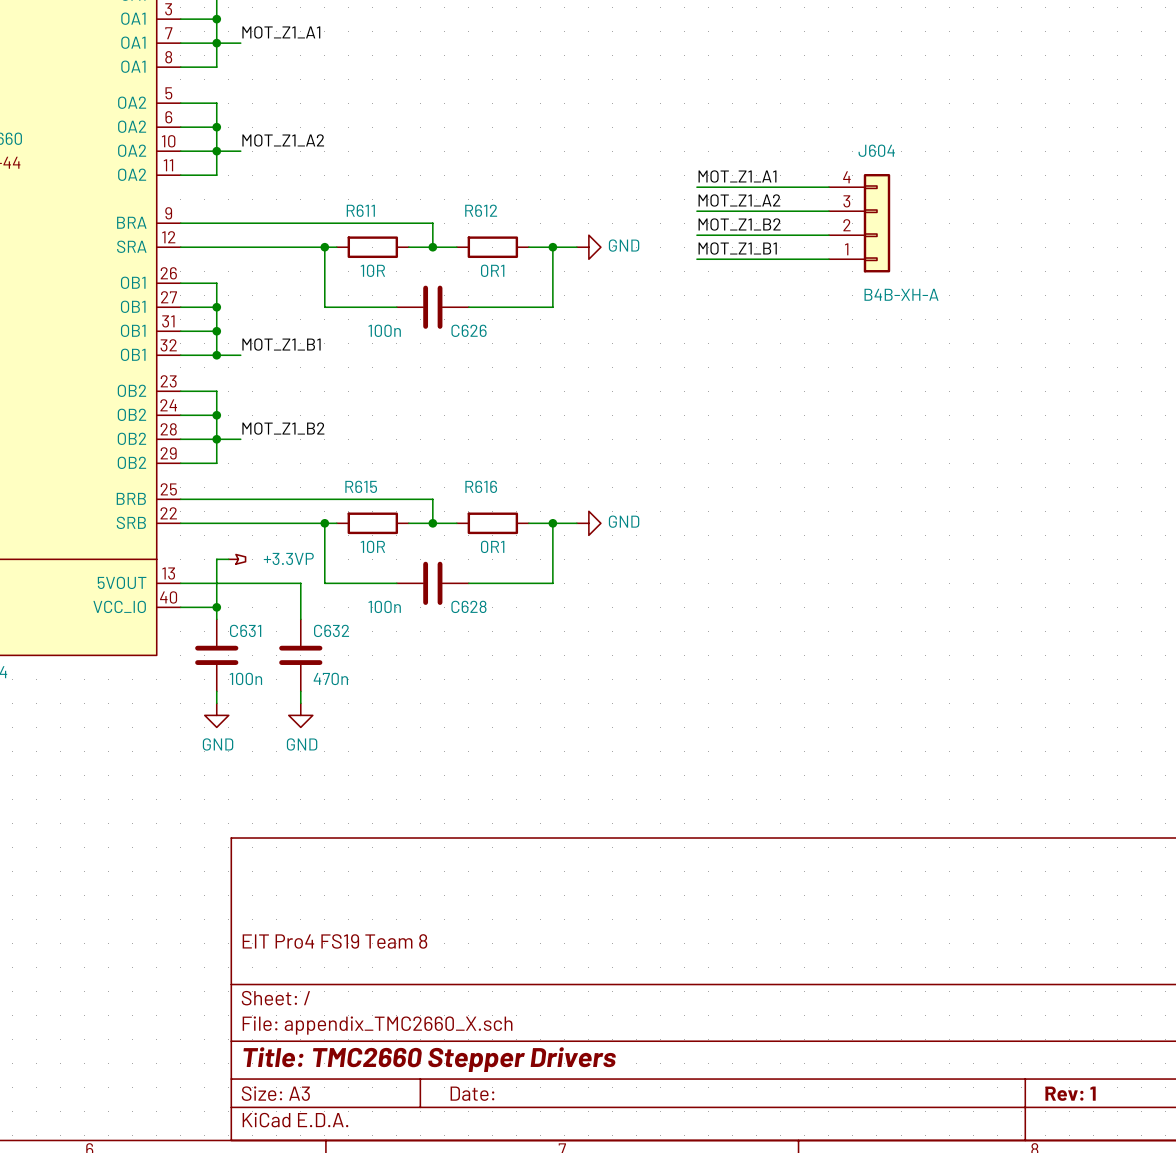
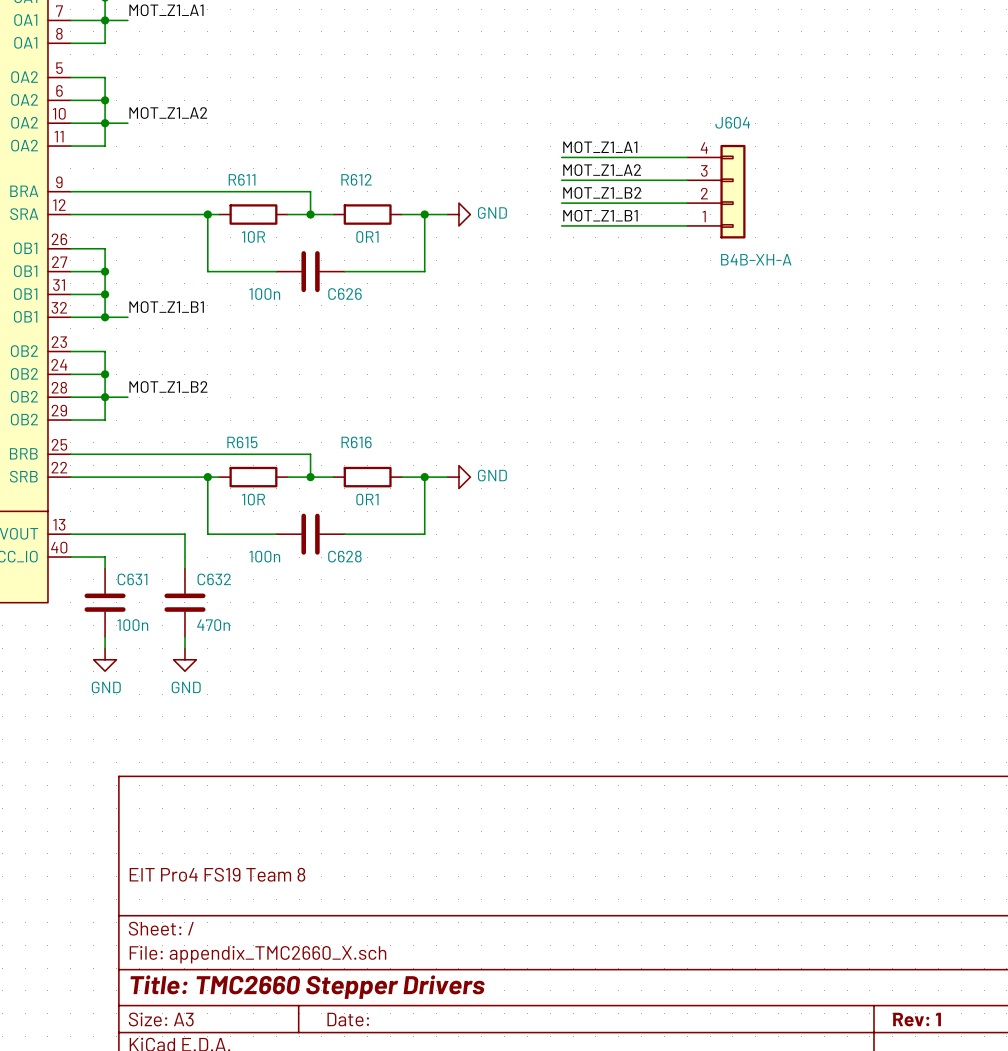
wire: (228, 559) (216, 559) (216, 607) -> none
power symbol: +3.3VP (237, 559) -> none
junction: (216, 607) -> none

